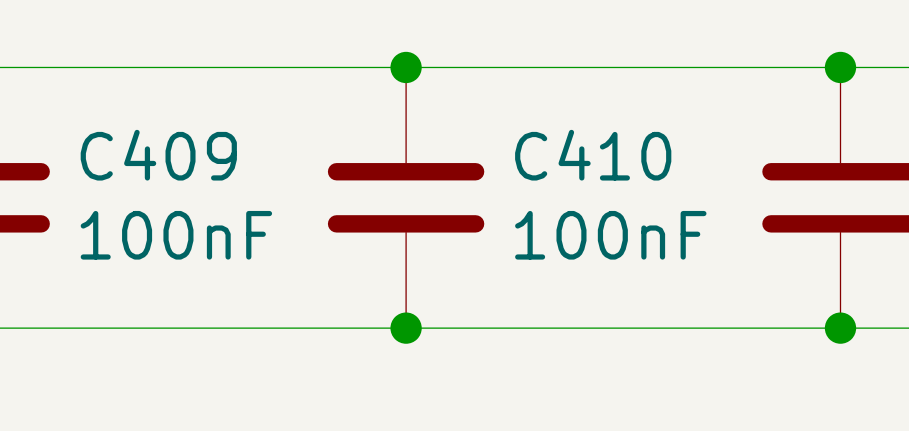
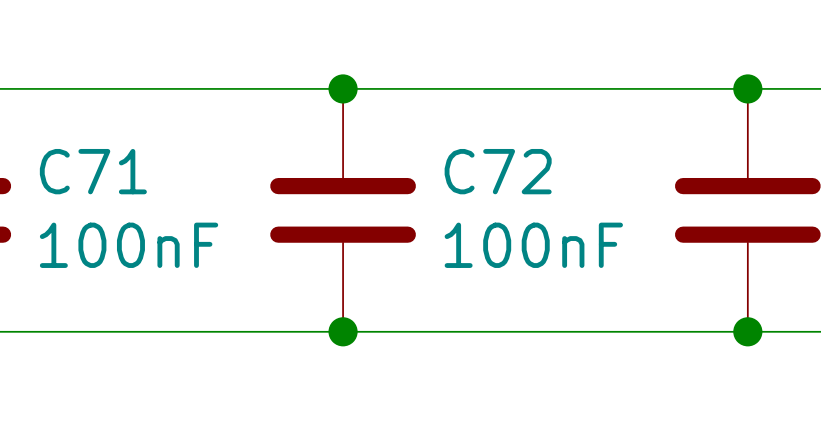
C409 name: C409 (158, 155) -> C71 (93, 171)
C410 name: C410 (593, 155) -> C72 (498, 171)

